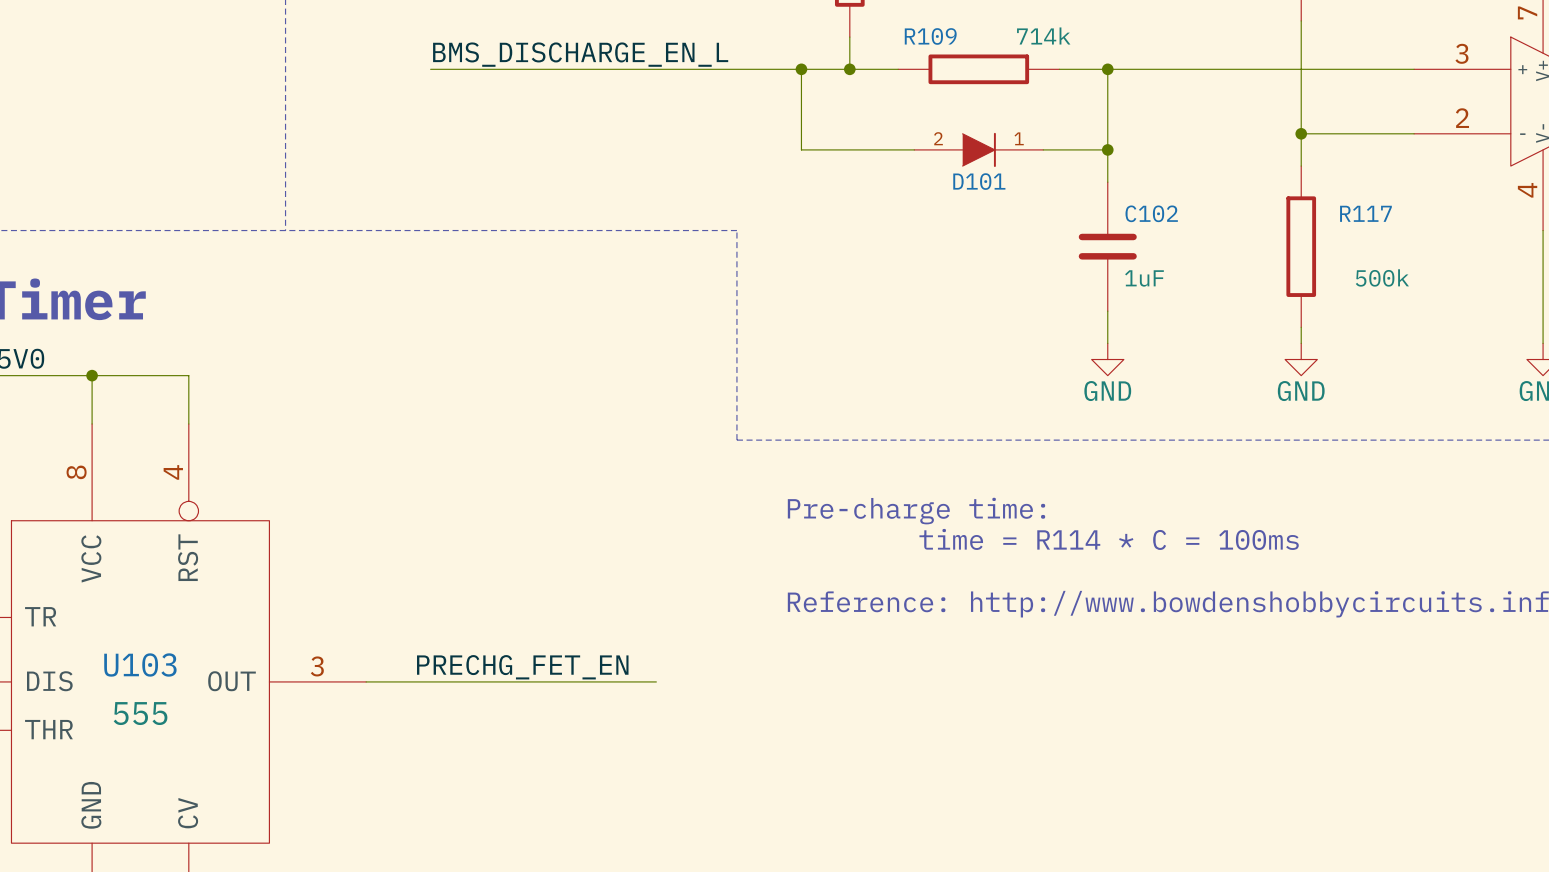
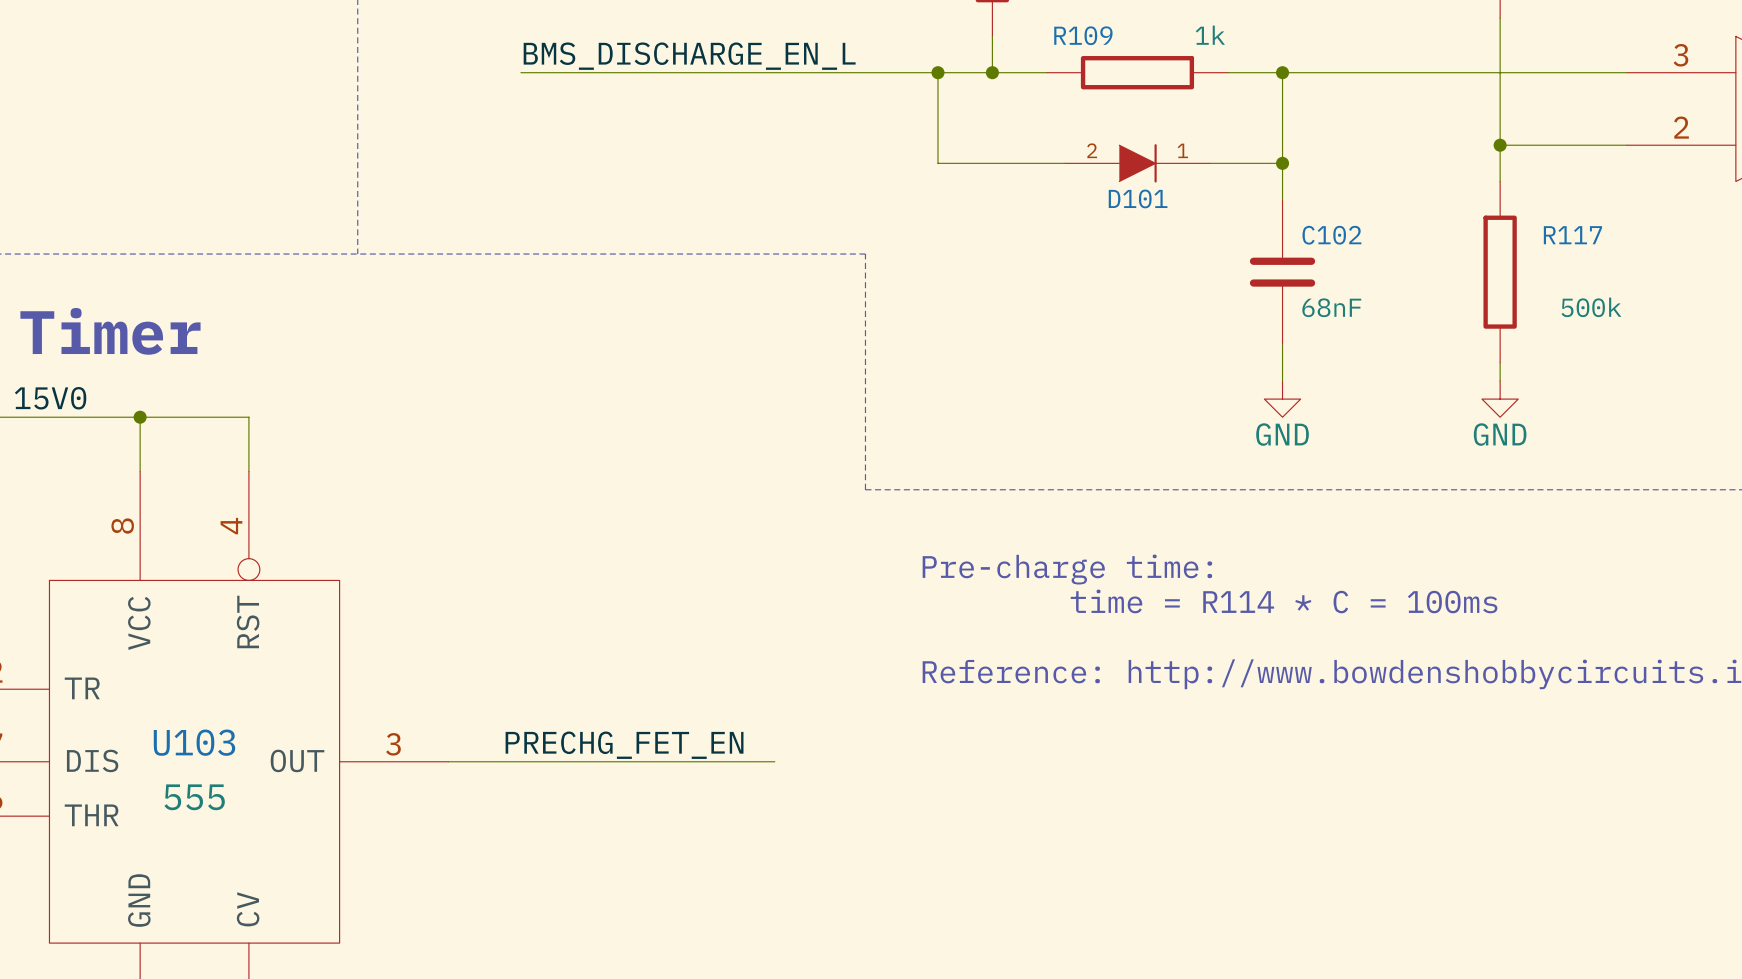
R109 value: 714k (1043, 35) -> 1k (1210, 35)
C102 value: 1uF (1144, 278) -> 68nF (1331, 307)

